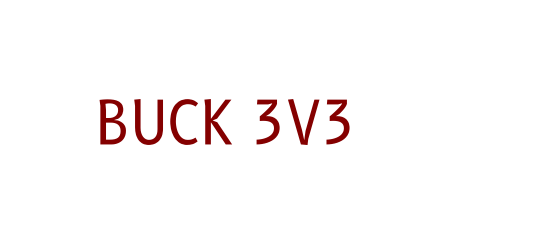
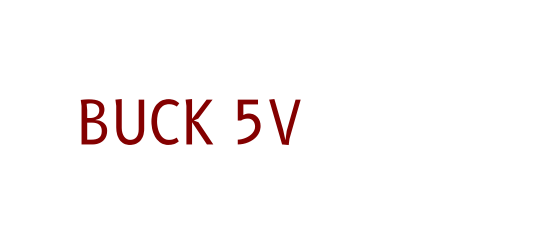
text: BUCK 3V3 (224, 122) -> BUCK 5V (190, 122)

